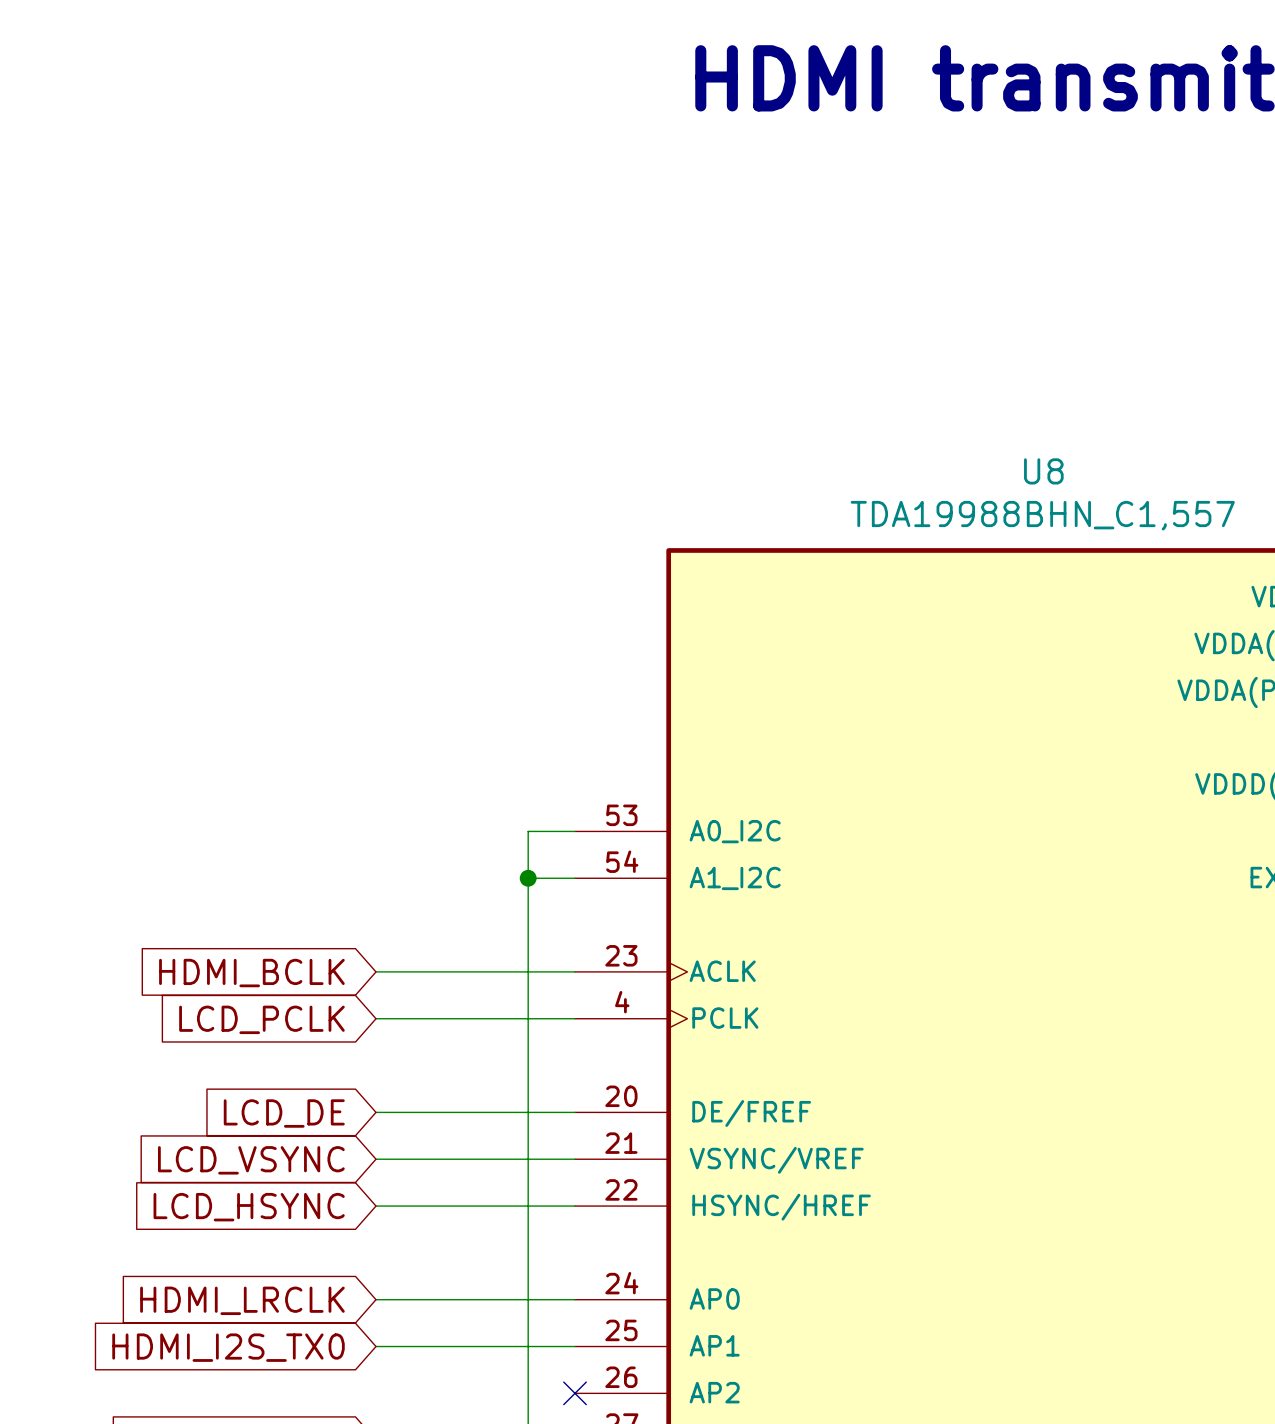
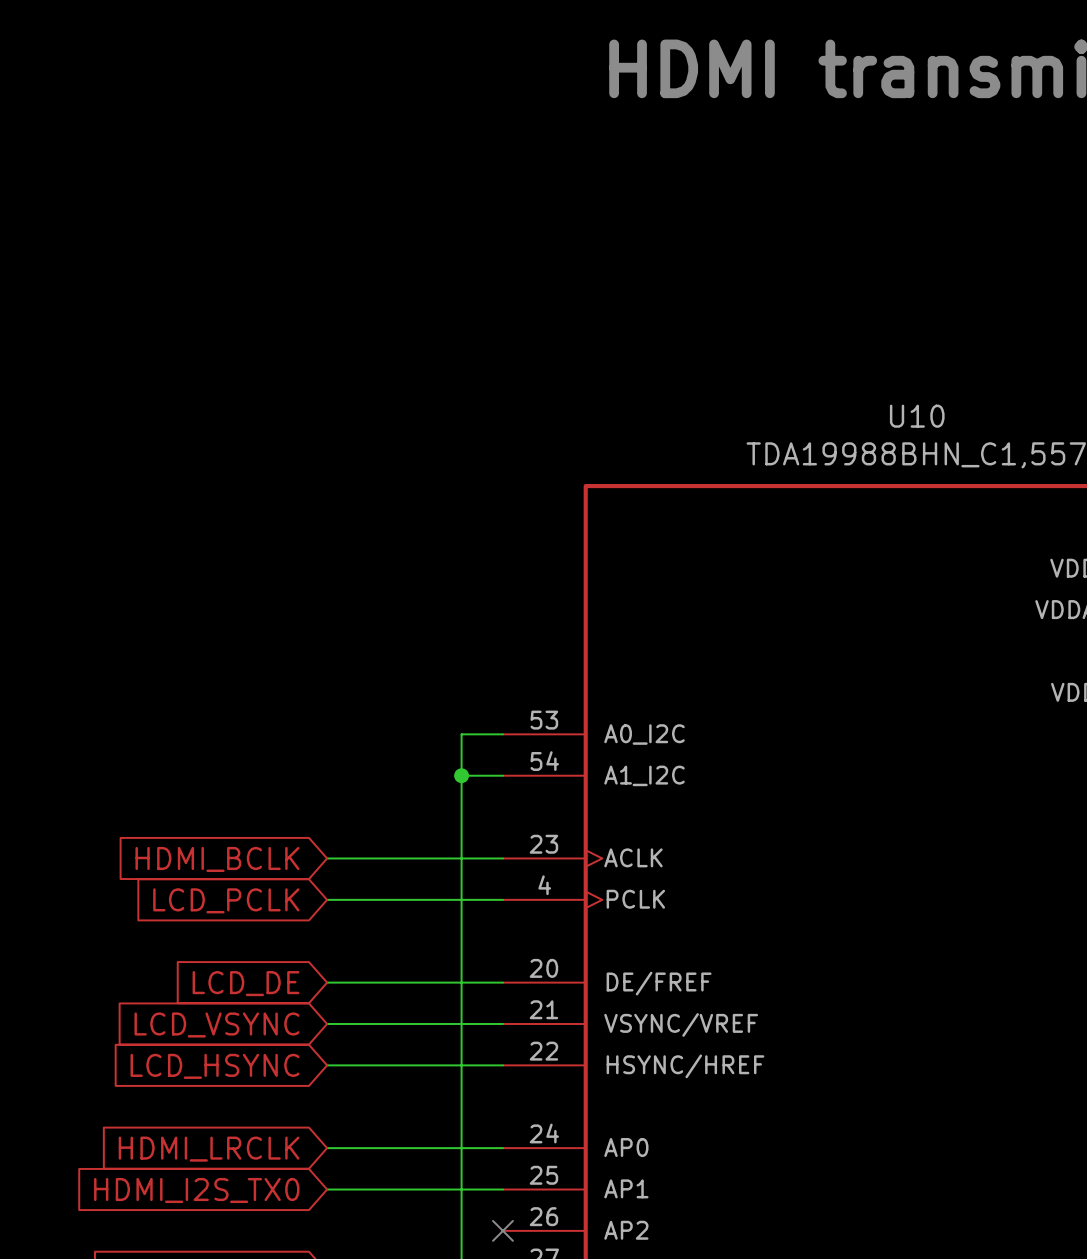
U8 name: U8 (1043, 471) -> U10 (917, 416)

